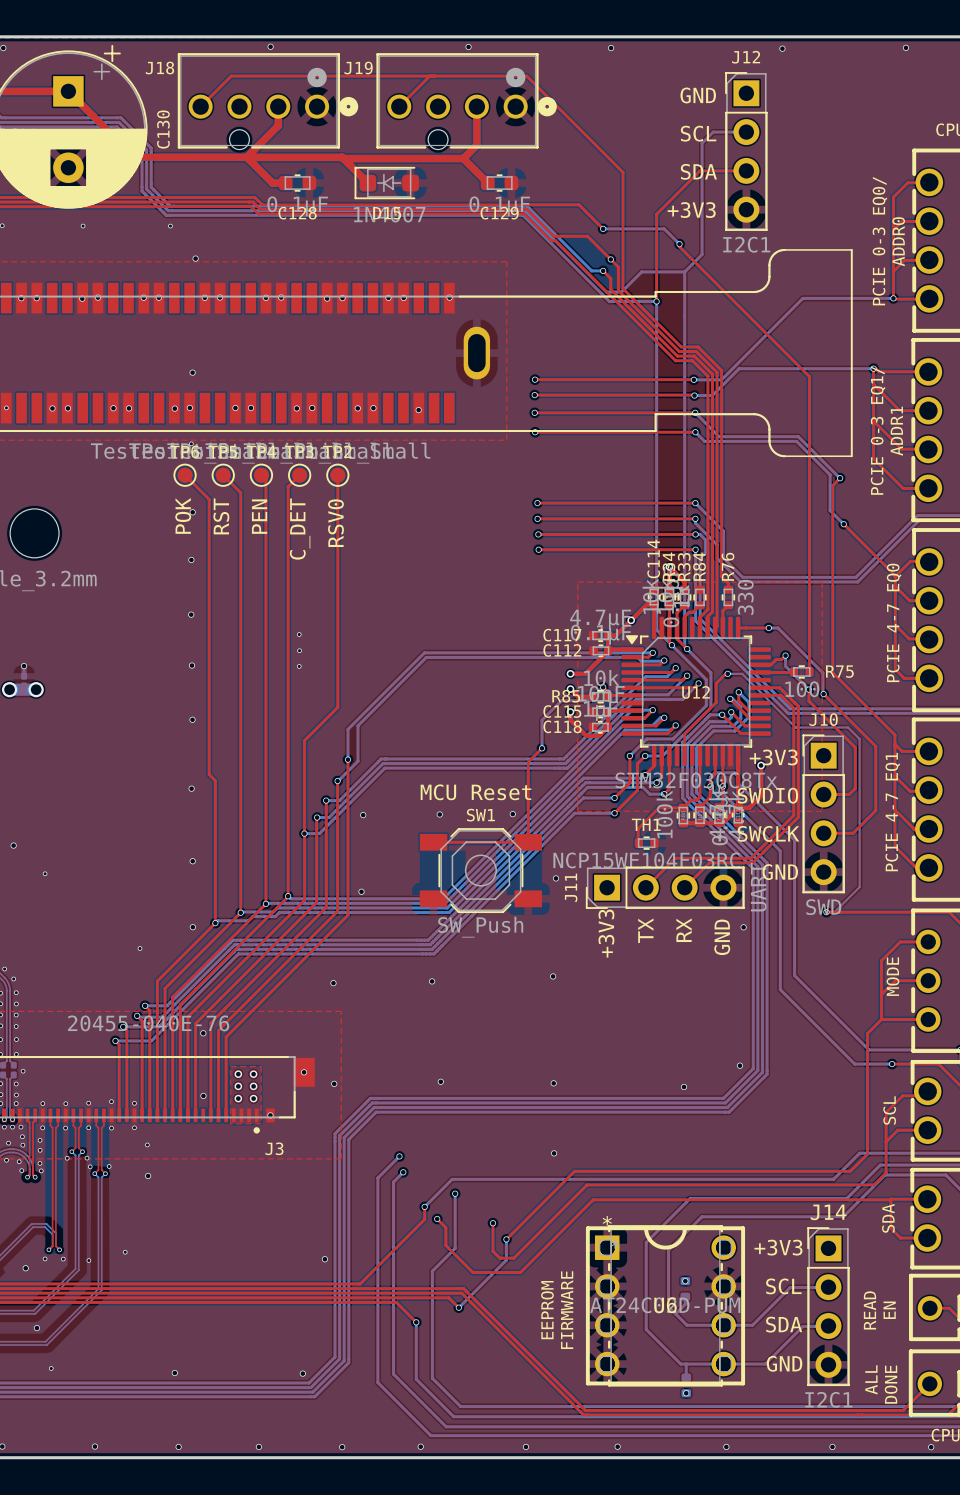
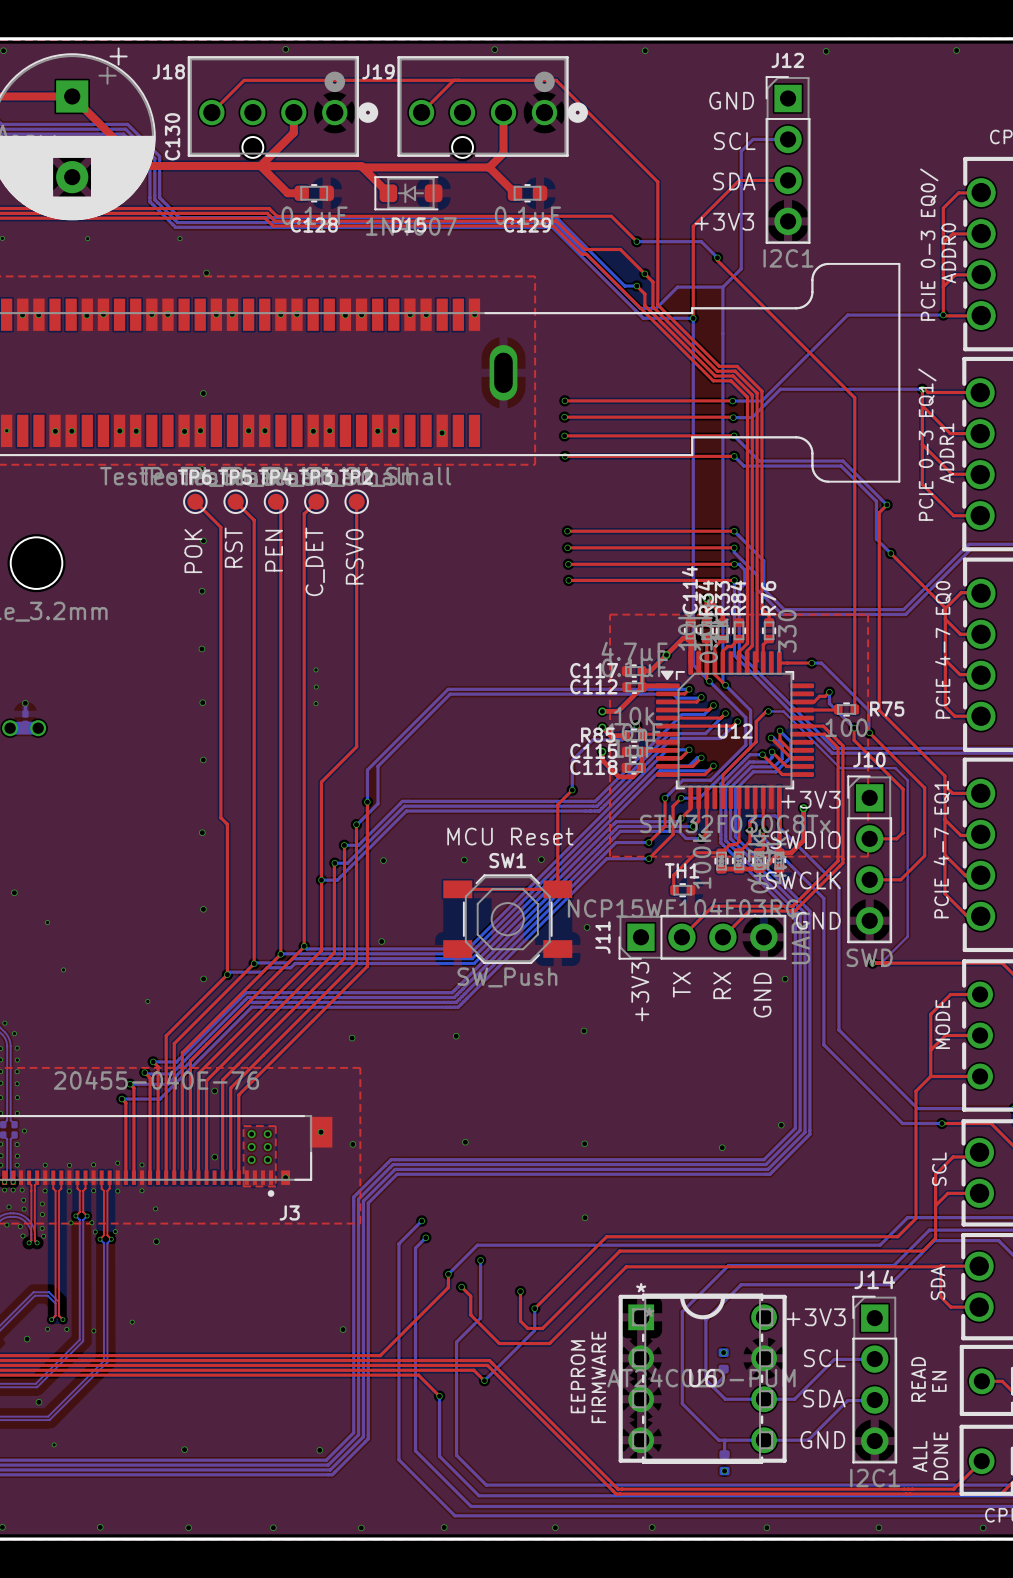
via: none -> (63, 969)

